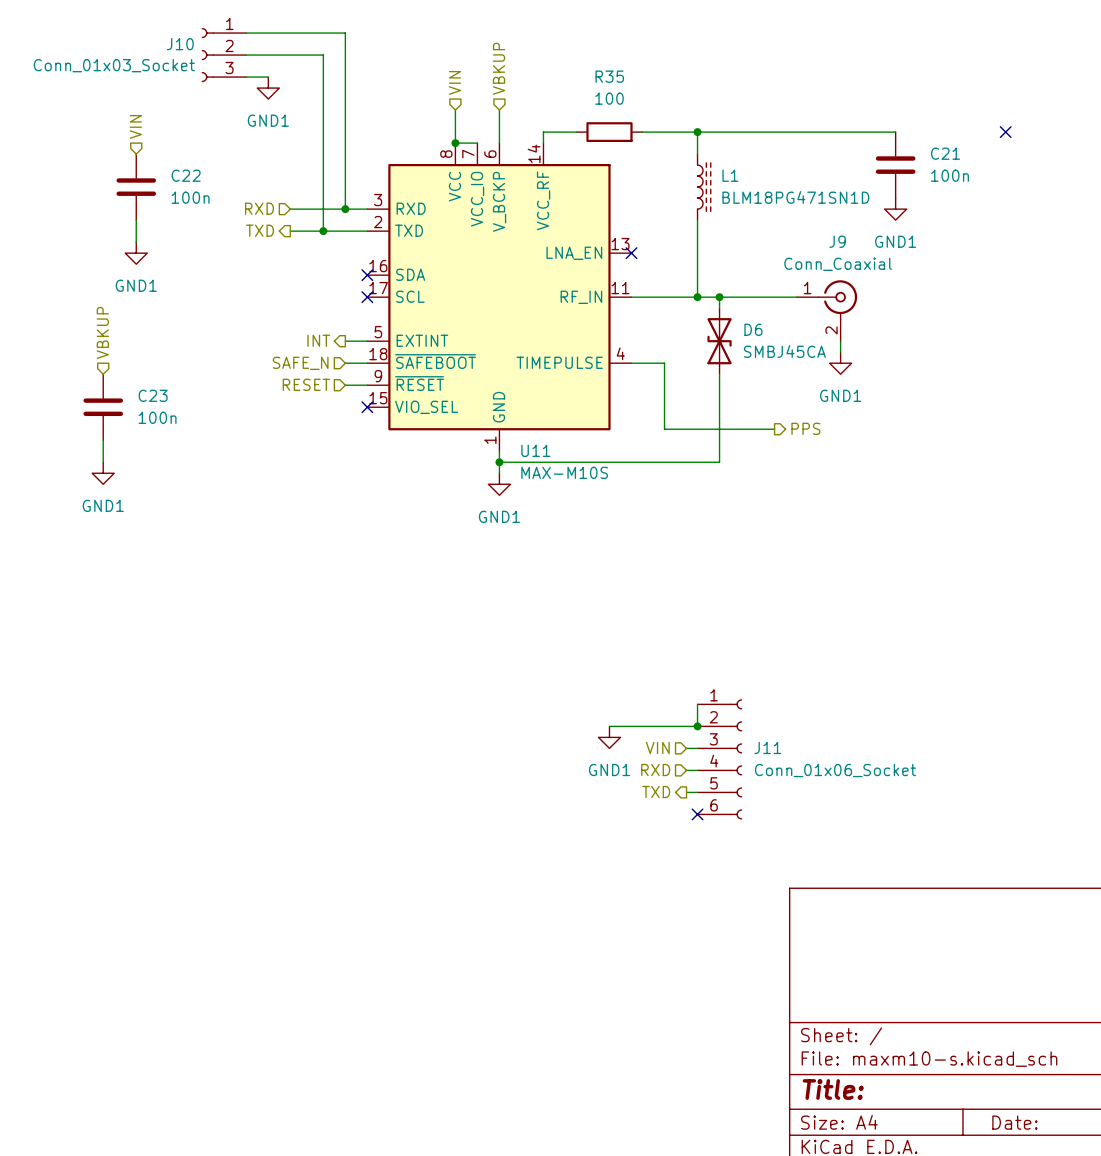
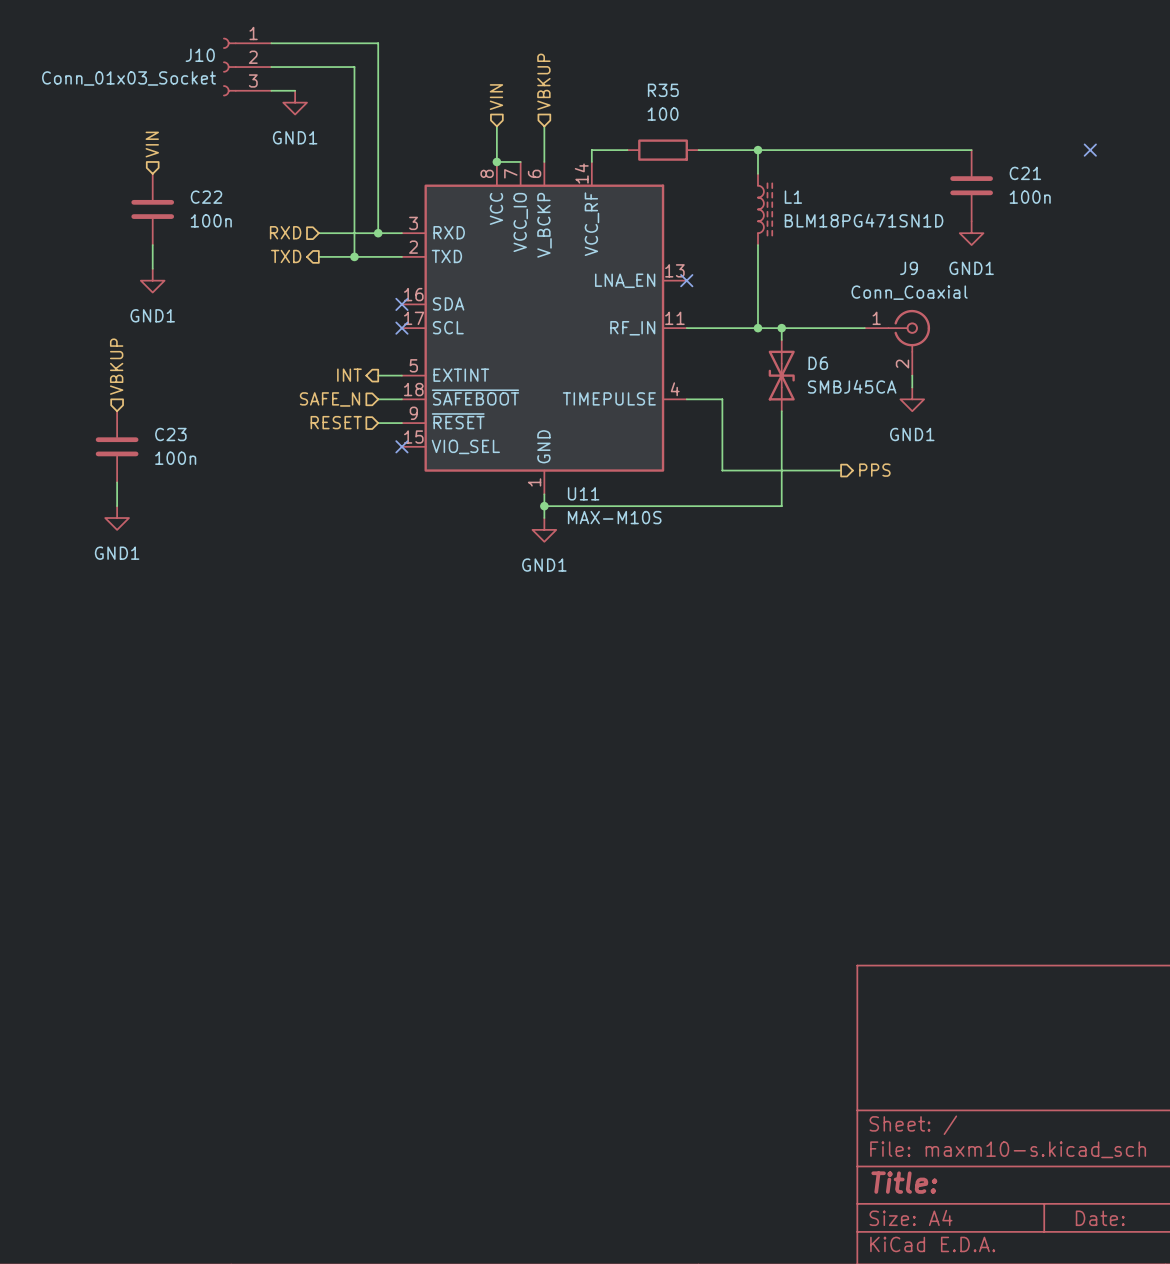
wire: (697, 704) (697, 726) (609, 726) -> none
junction: (697, 726) -> none
power symbol: GND1 (609, 737) -> none
hierarchical label: VIN (657, 747) -> none
wire: (686, 748) (697, 748) -> none
J11: Conn_01x06_Socket (719, 759) -> none
hierarchical label: RXD (655, 769) -> none
wire: (686, 770) (697, 770) -> none
hierarchical label: TXD (656, 792) -> none
wire: (686, 792) (697, 792) -> none
no-connect mark: (697, 814) -> none

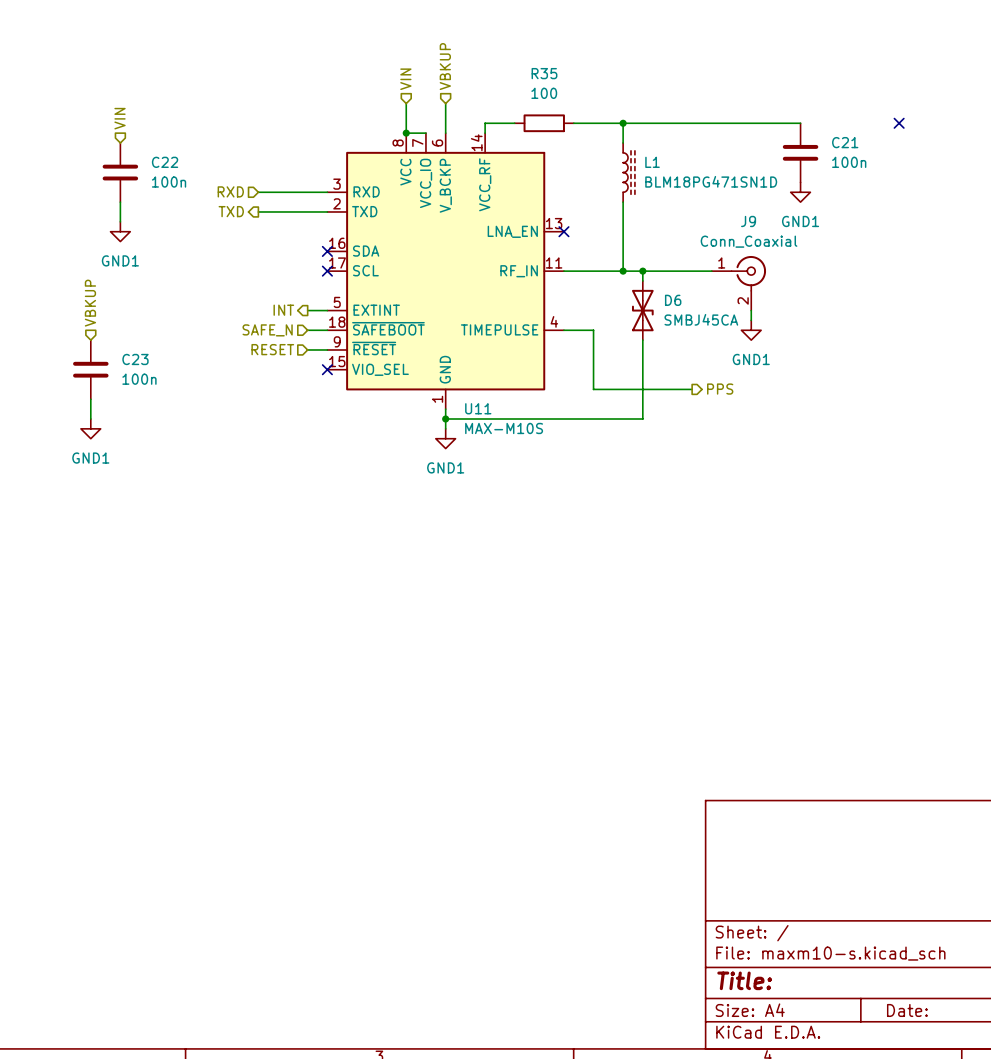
wire: (271, 43) (378, 43) (378, 233) -> none
J10: Conn_01x03_Socket (247, 67) -> none
wire: (271, 67) (354, 67) (354, 256) -> none
wire: (271, 90) (295, 90) -> none
power symbol: GND1 (295, 102) -> none
junction: (378, 233) -> none
junction: (354, 256) -> none

